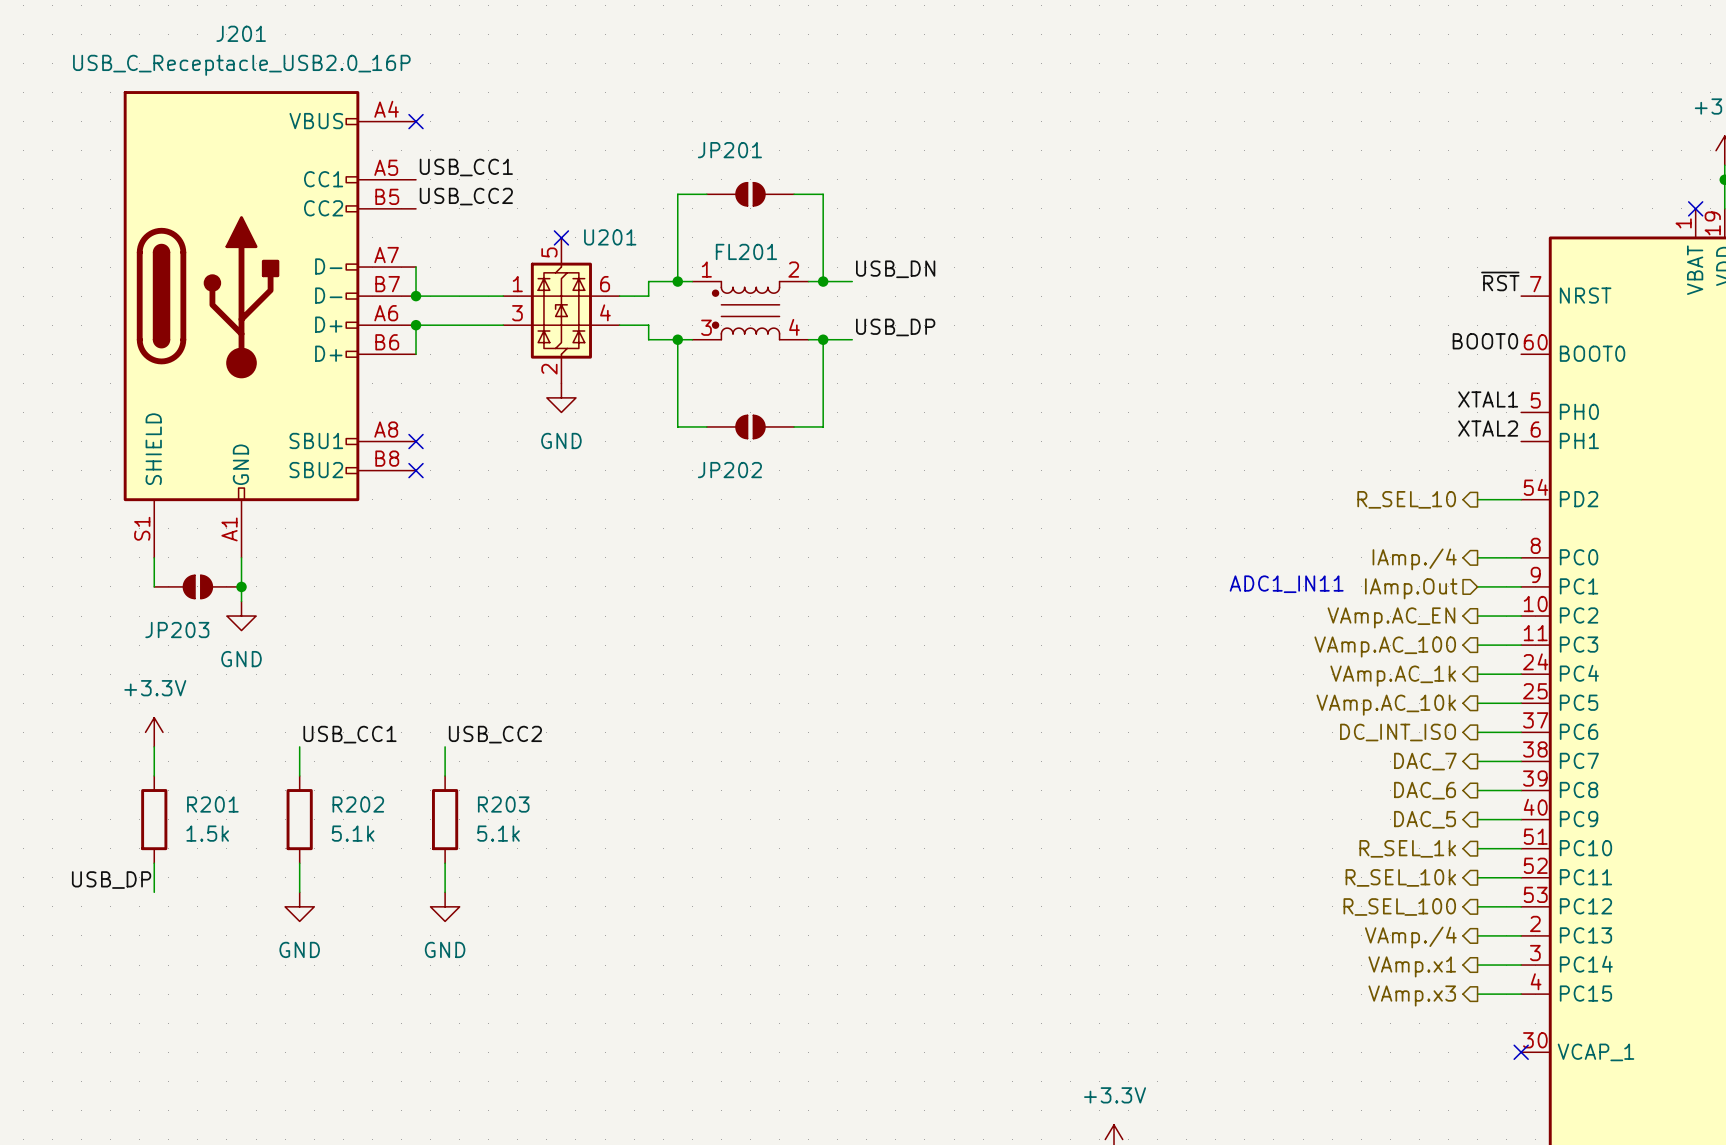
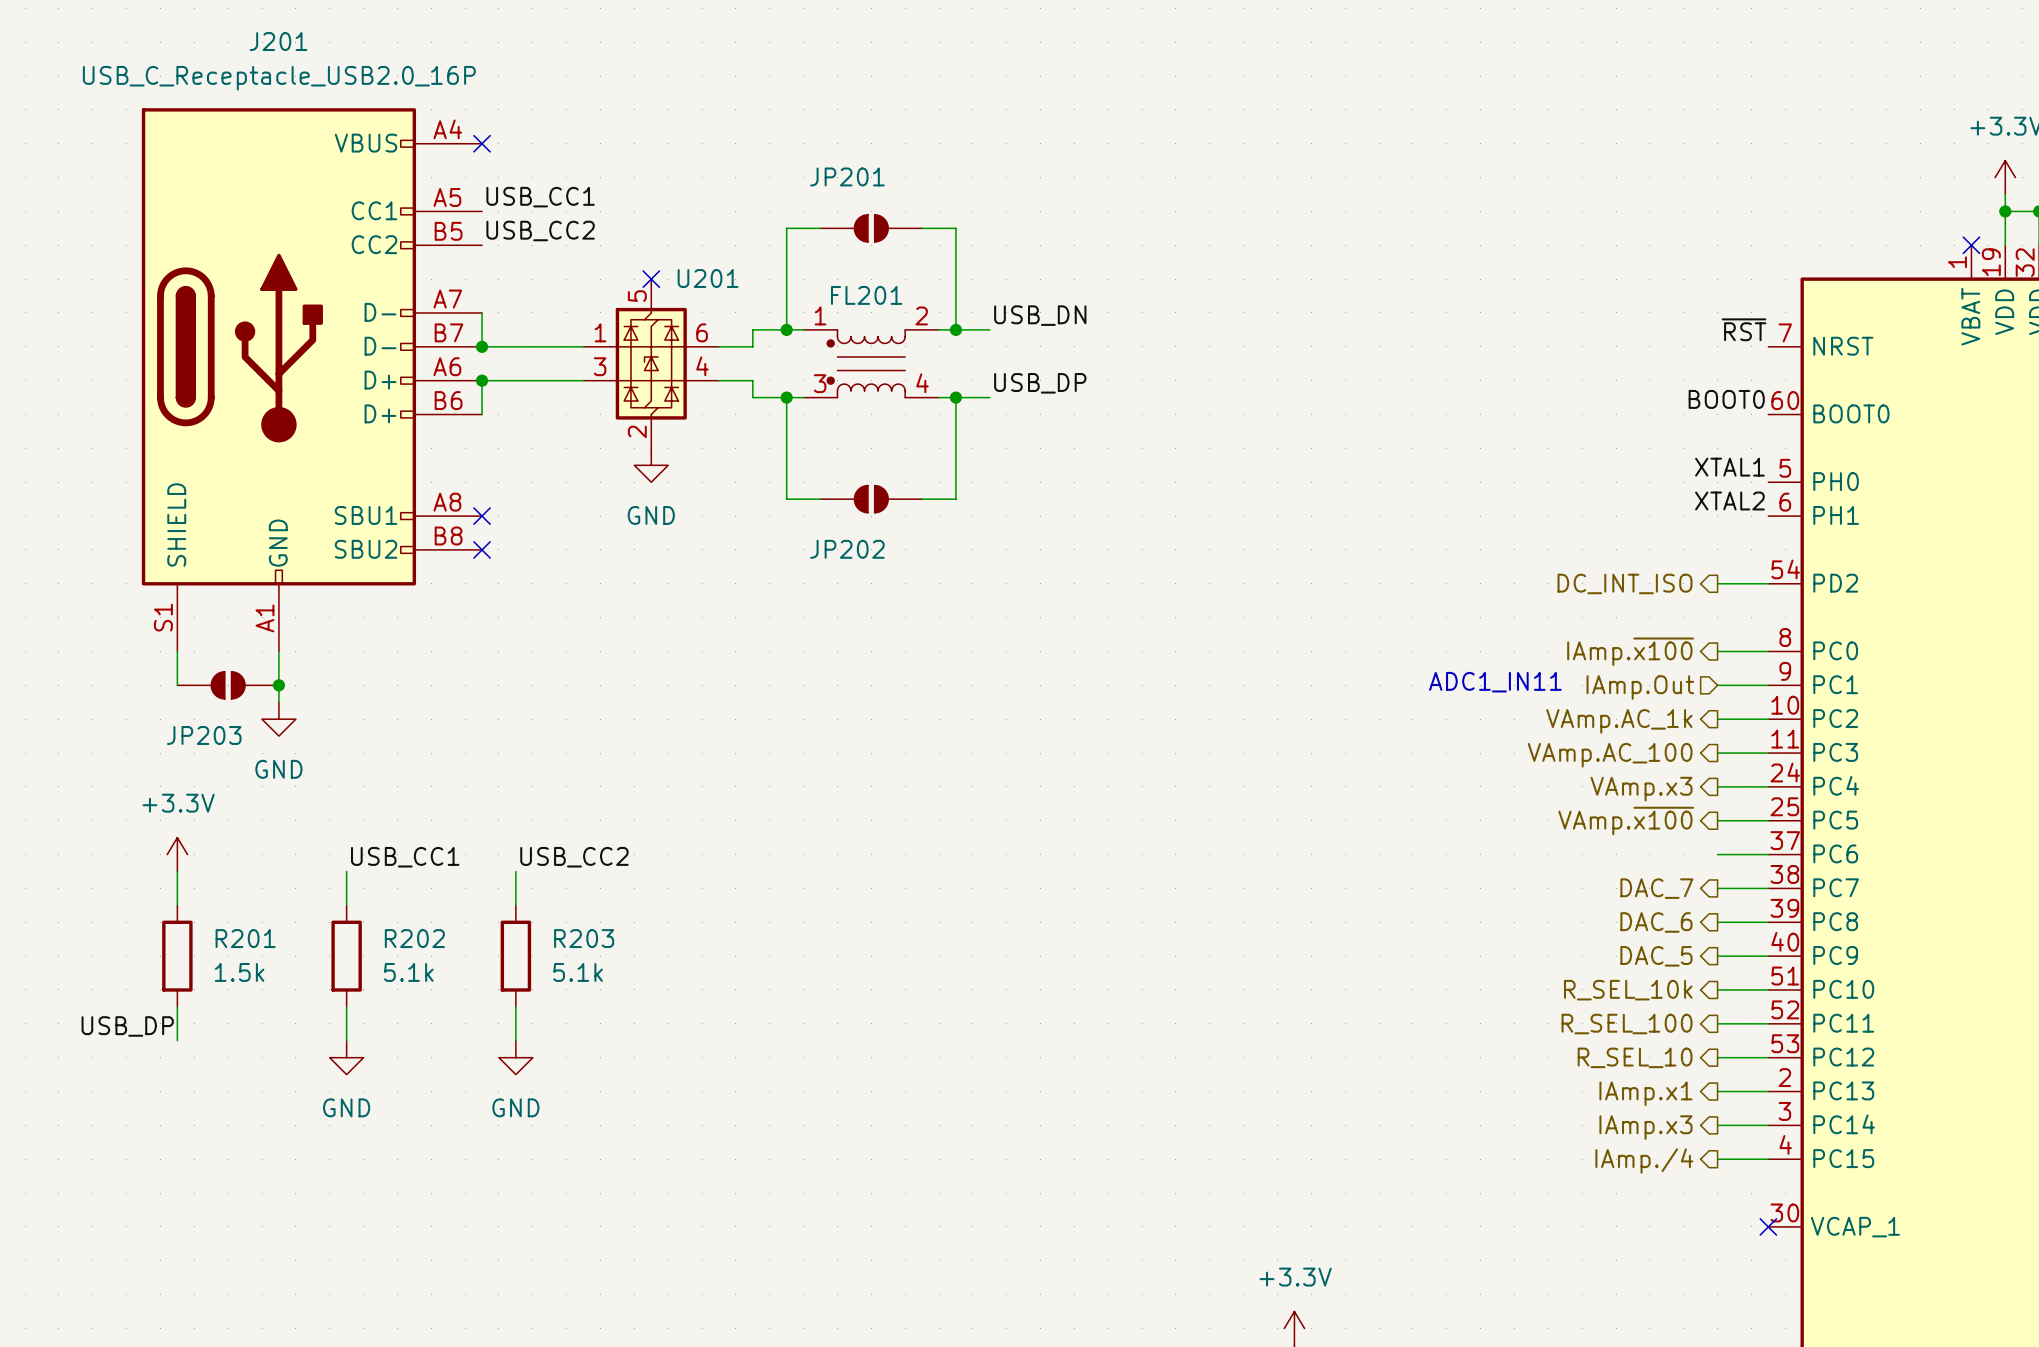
hierarchical label: R_SEL_10 (1406, 499) -> DC_INT_ISO (1625, 583)
hierarchical label: IAmp./4 (1414, 559) -> IAmp.~{x100} (1630, 651)
hierarchical label: VAmp.AC_EN (1391, 617) -> VAmp.AC_1k (1619, 721)
hierarchical label: VAmp.AC_1k (1393, 676) -> VAmp.x3 (1641, 789)
hierarchical label: VAmp.AC_10k (1386, 705) -> VAmp.~{x100} (1626, 820)
hierarchical label: DC_INT_ISO (1398, 732) -> none
hierarchical label: R_SEL_1k (1407, 848) -> R_SEL_10k (1628, 990)
hierarchical label: R_SEL_10k (1400, 877) -> R_SEL_100 (1627, 1024)
hierarchical label: R_SEL_100 (1399, 907) -> R_SEL_10 (1635, 1057)
hierarchical label: VAmp./4 (1410, 937) -> IAmp.x1 (1645, 1093)
hierarchical label: VAmp.x1 (1412, 966) -> IAmp.x3 (1645, 1127)
hierarchical label: VAmp.x3 (1412, 995) -> IAmp./4 (1644, 1161)

